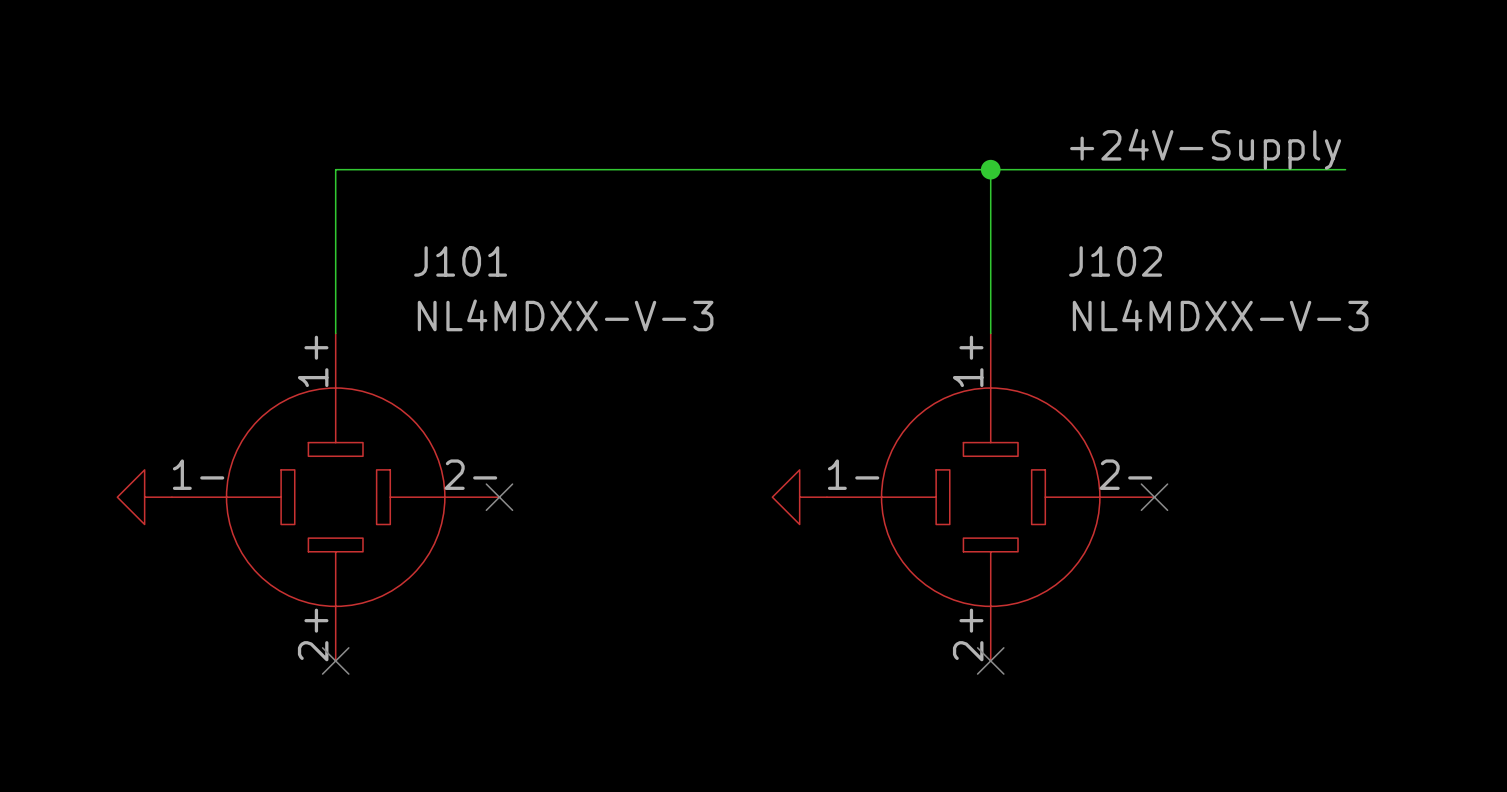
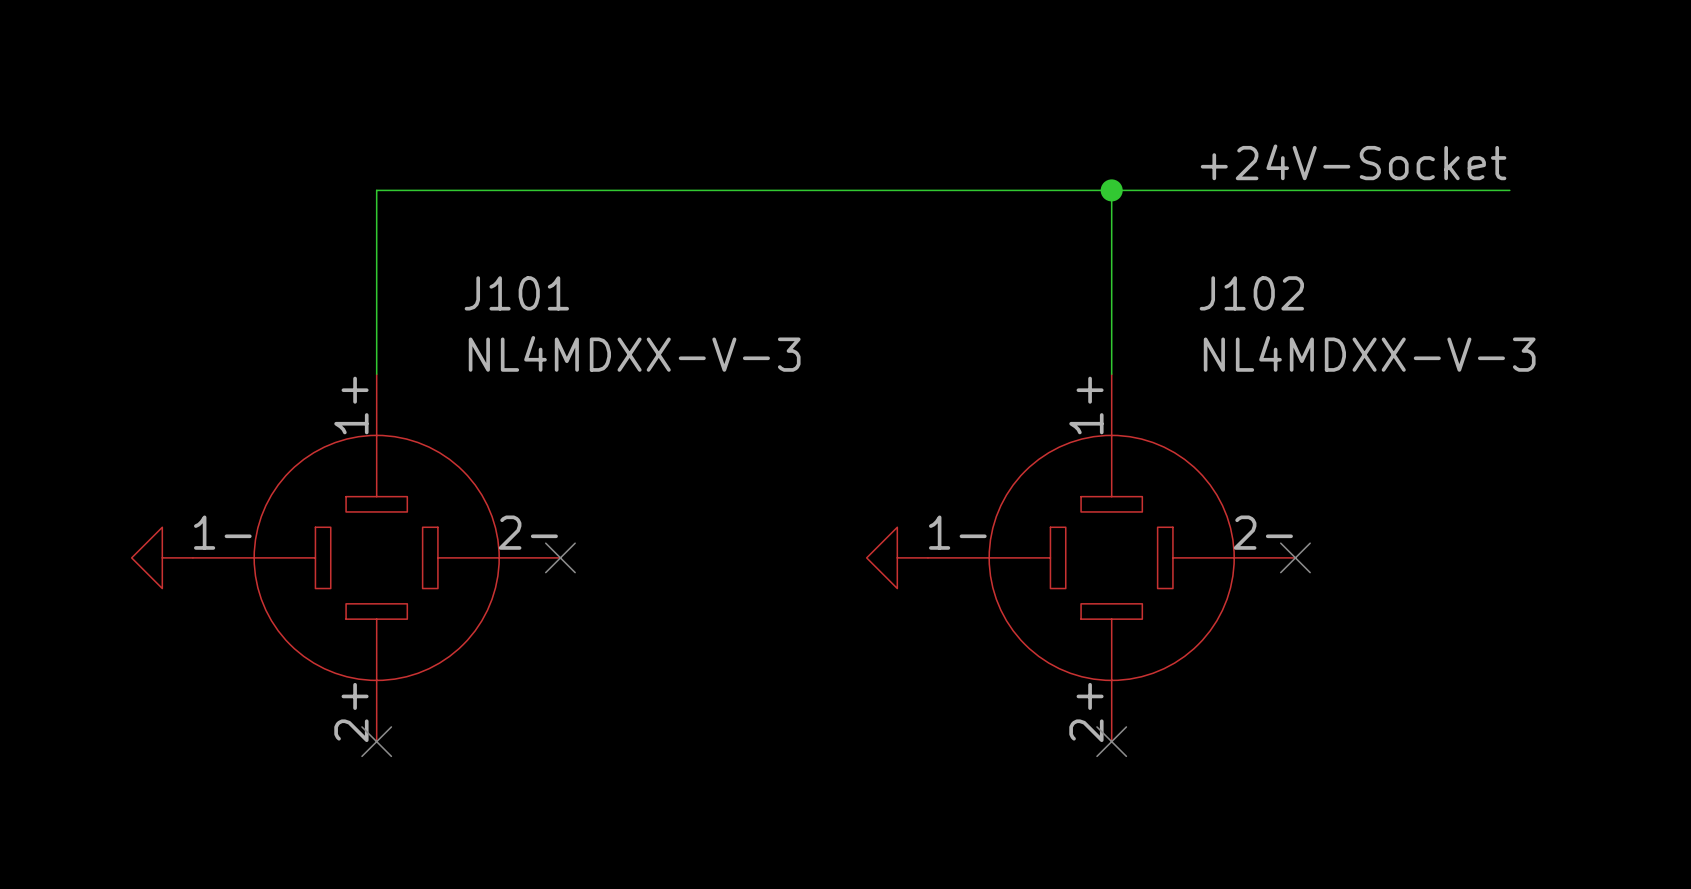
label: +24V-Supply (1205, 149) -> +24V-Socket (1353, 162)

